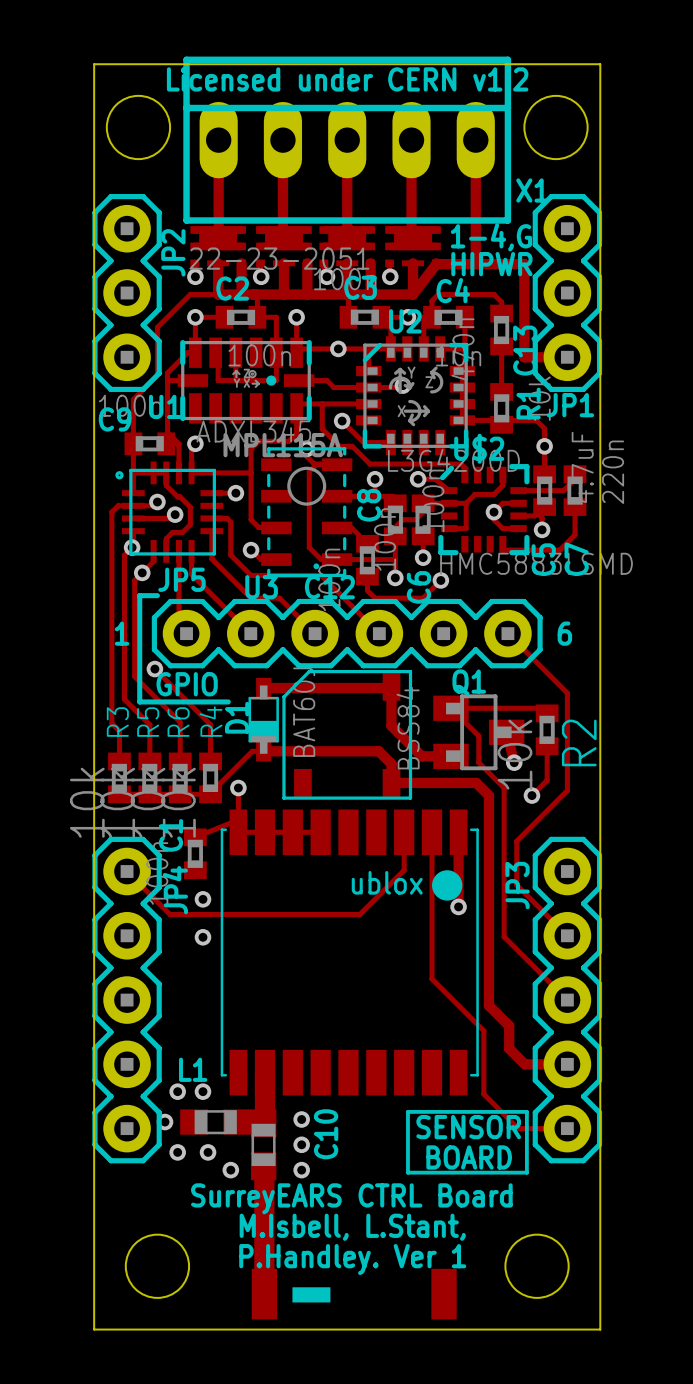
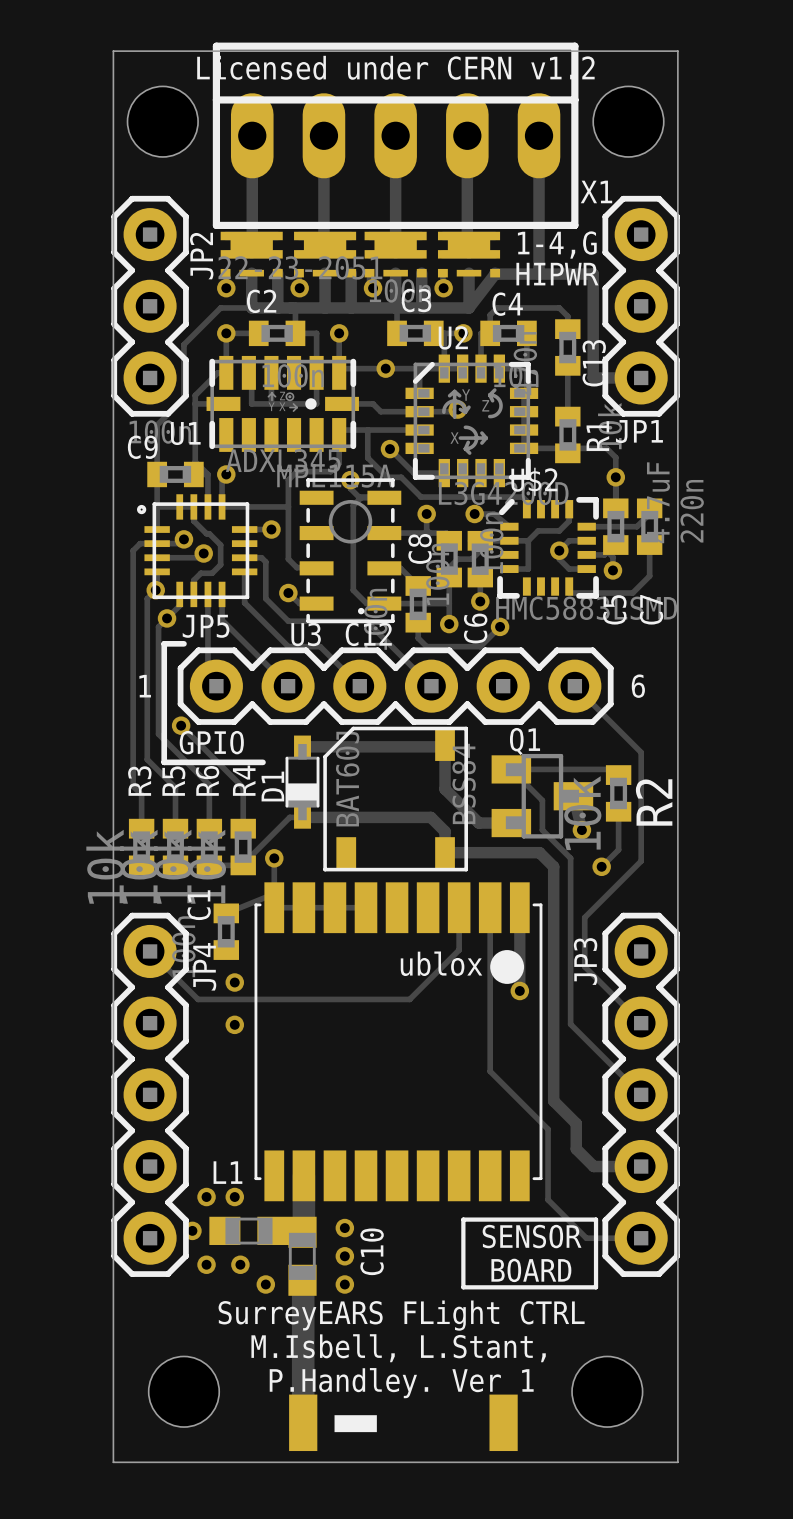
text: SurreyEARS CTRL Board (351, 1198) -> SurreyEARS FLight CTRL (401, 1315)

